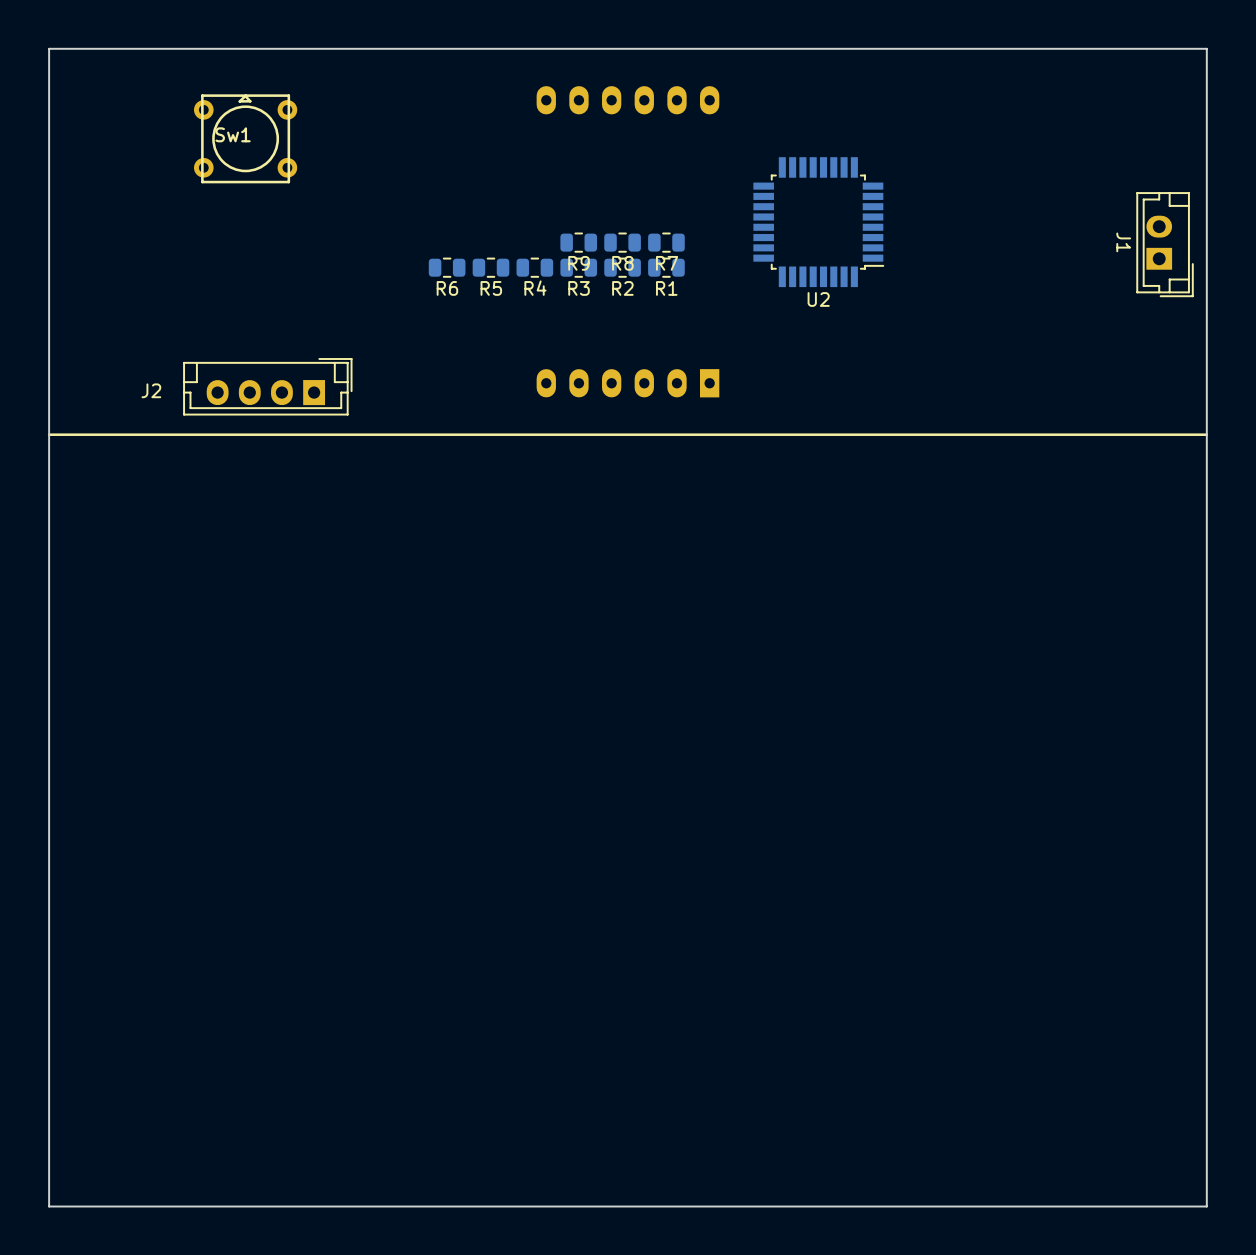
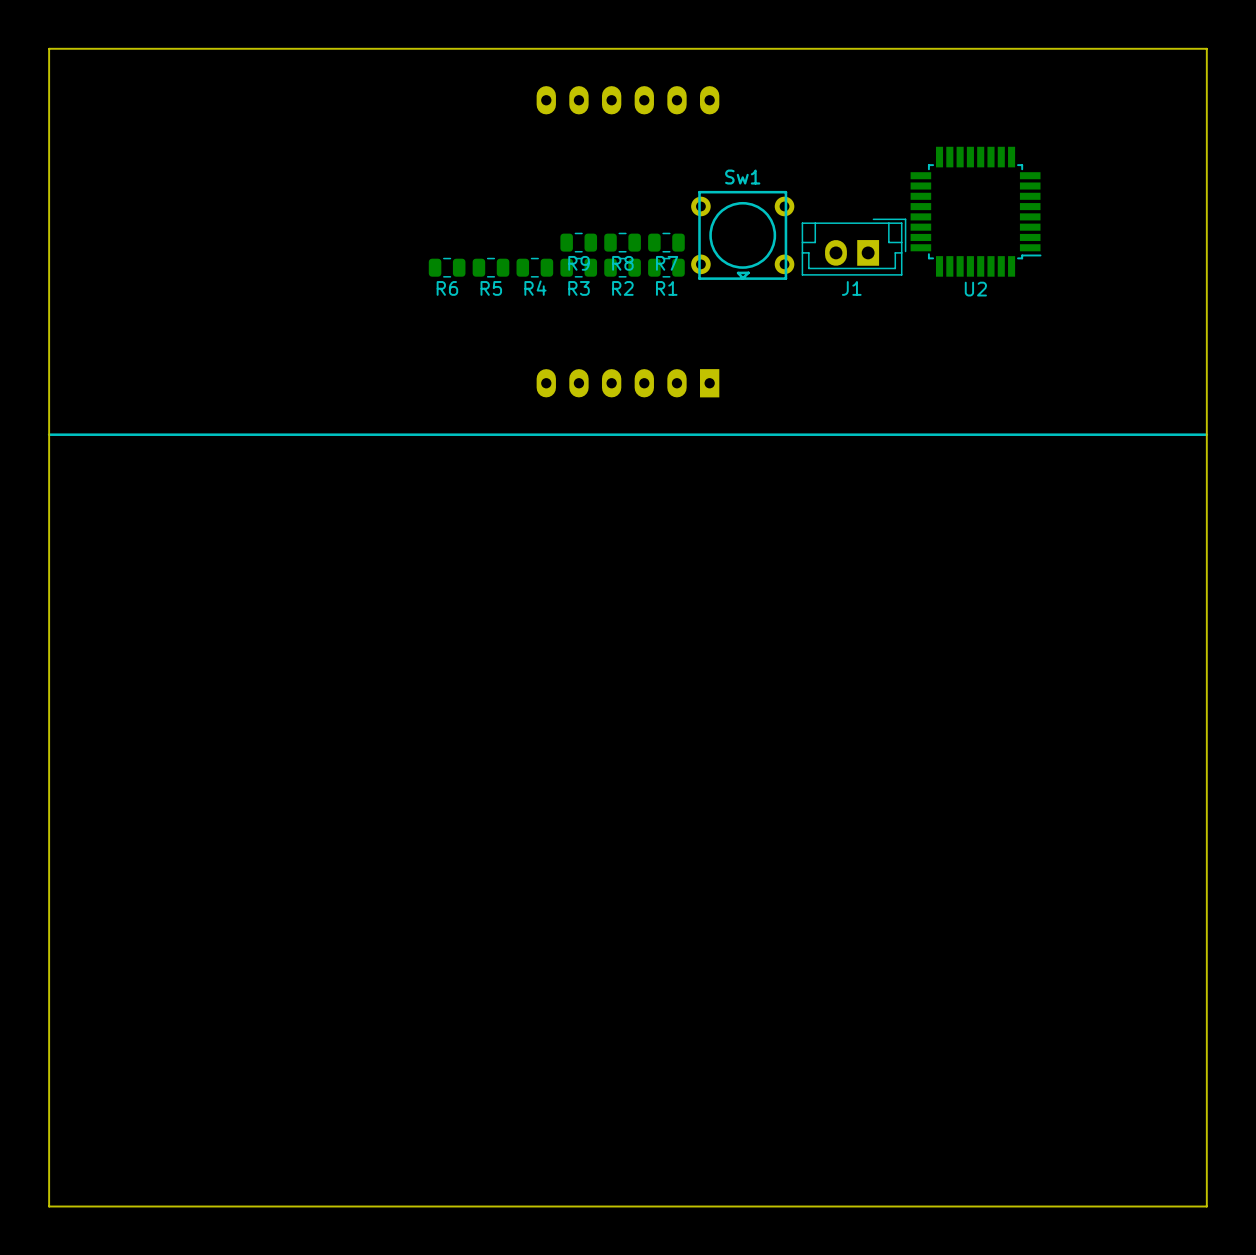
Sw1 name position: Sw1 (233, 134) -> Sw1 (742, 177)
Sw1 rotation: 0° (245, 138) -> 180° (742, 235)
Sw1 position: (245, 138) -> (742, 235)
U2 position: (818, 222) -> (976, 211)
J1 rotation: 0° (1165, 244) -> 90° counterclockwise (853, 247)
J1 position: (1165, 244) -> (853, 247)
J2: (267, 386) -> none

